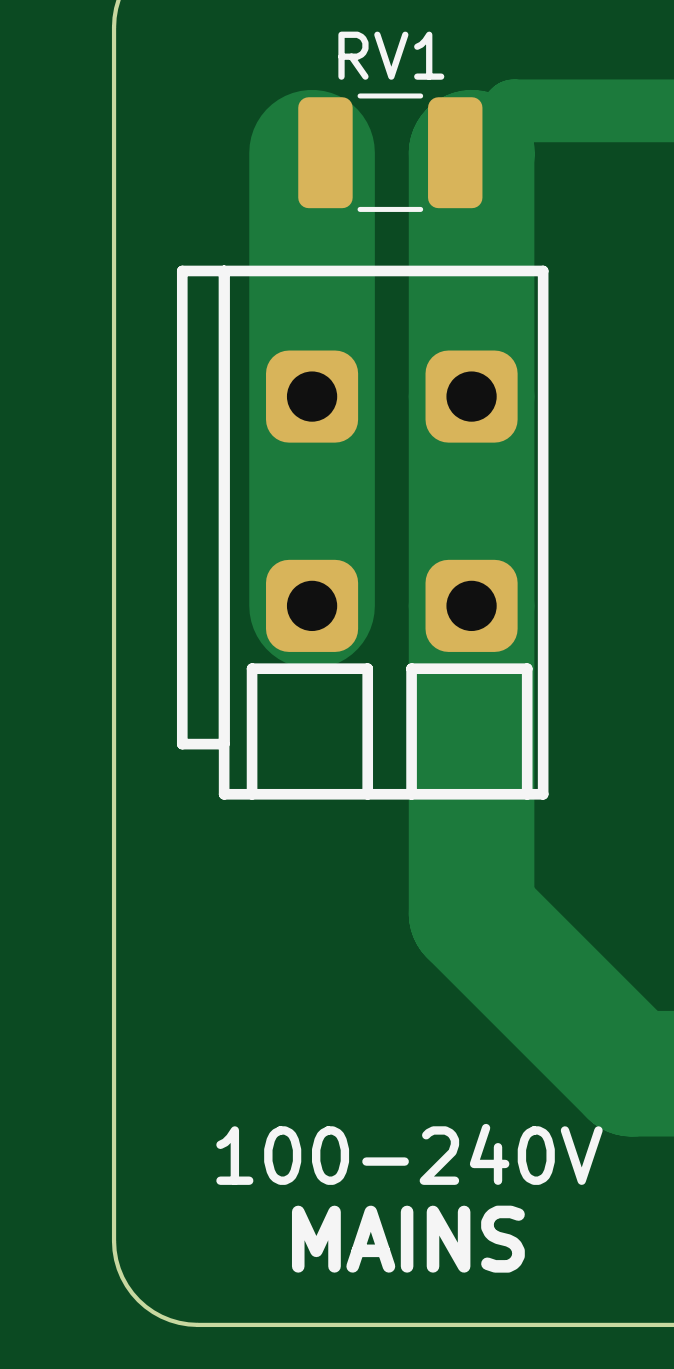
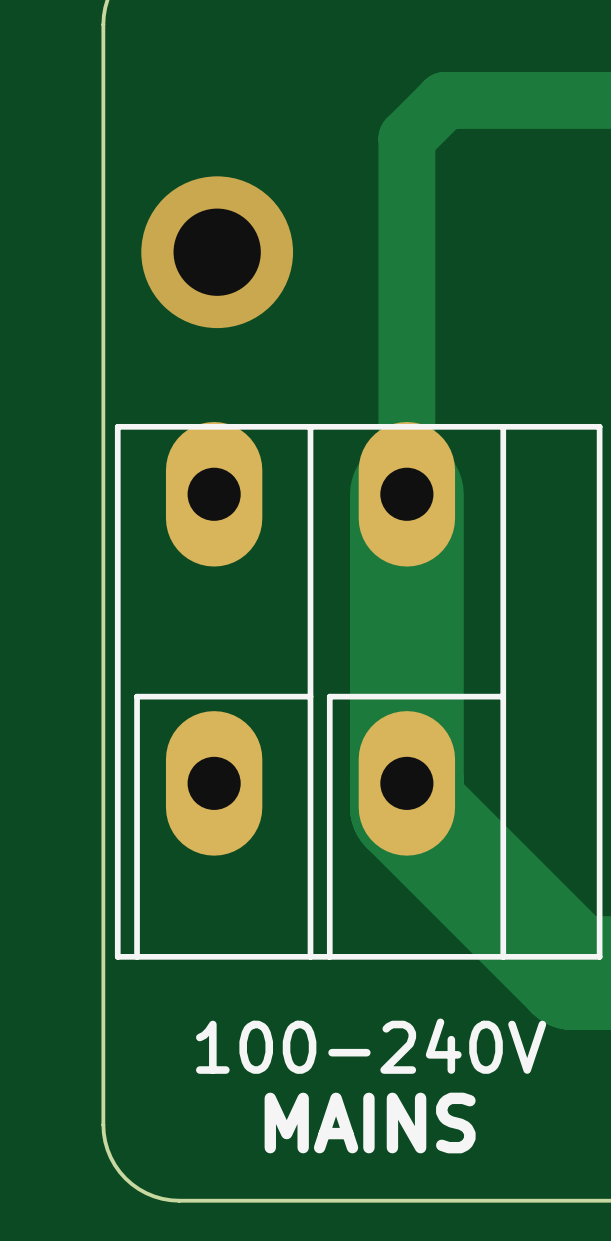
track: (312, 152) (312, 605) -> none
RV1: (390, 152) -> none
track: (471, 153) (471, 913) -> (465, 100) (444, 100) (406, 138) (406, 807) (427, 827)
via: none -> (217, 252)
part: (362, 532) -> none
part: none -> (358, 690)

